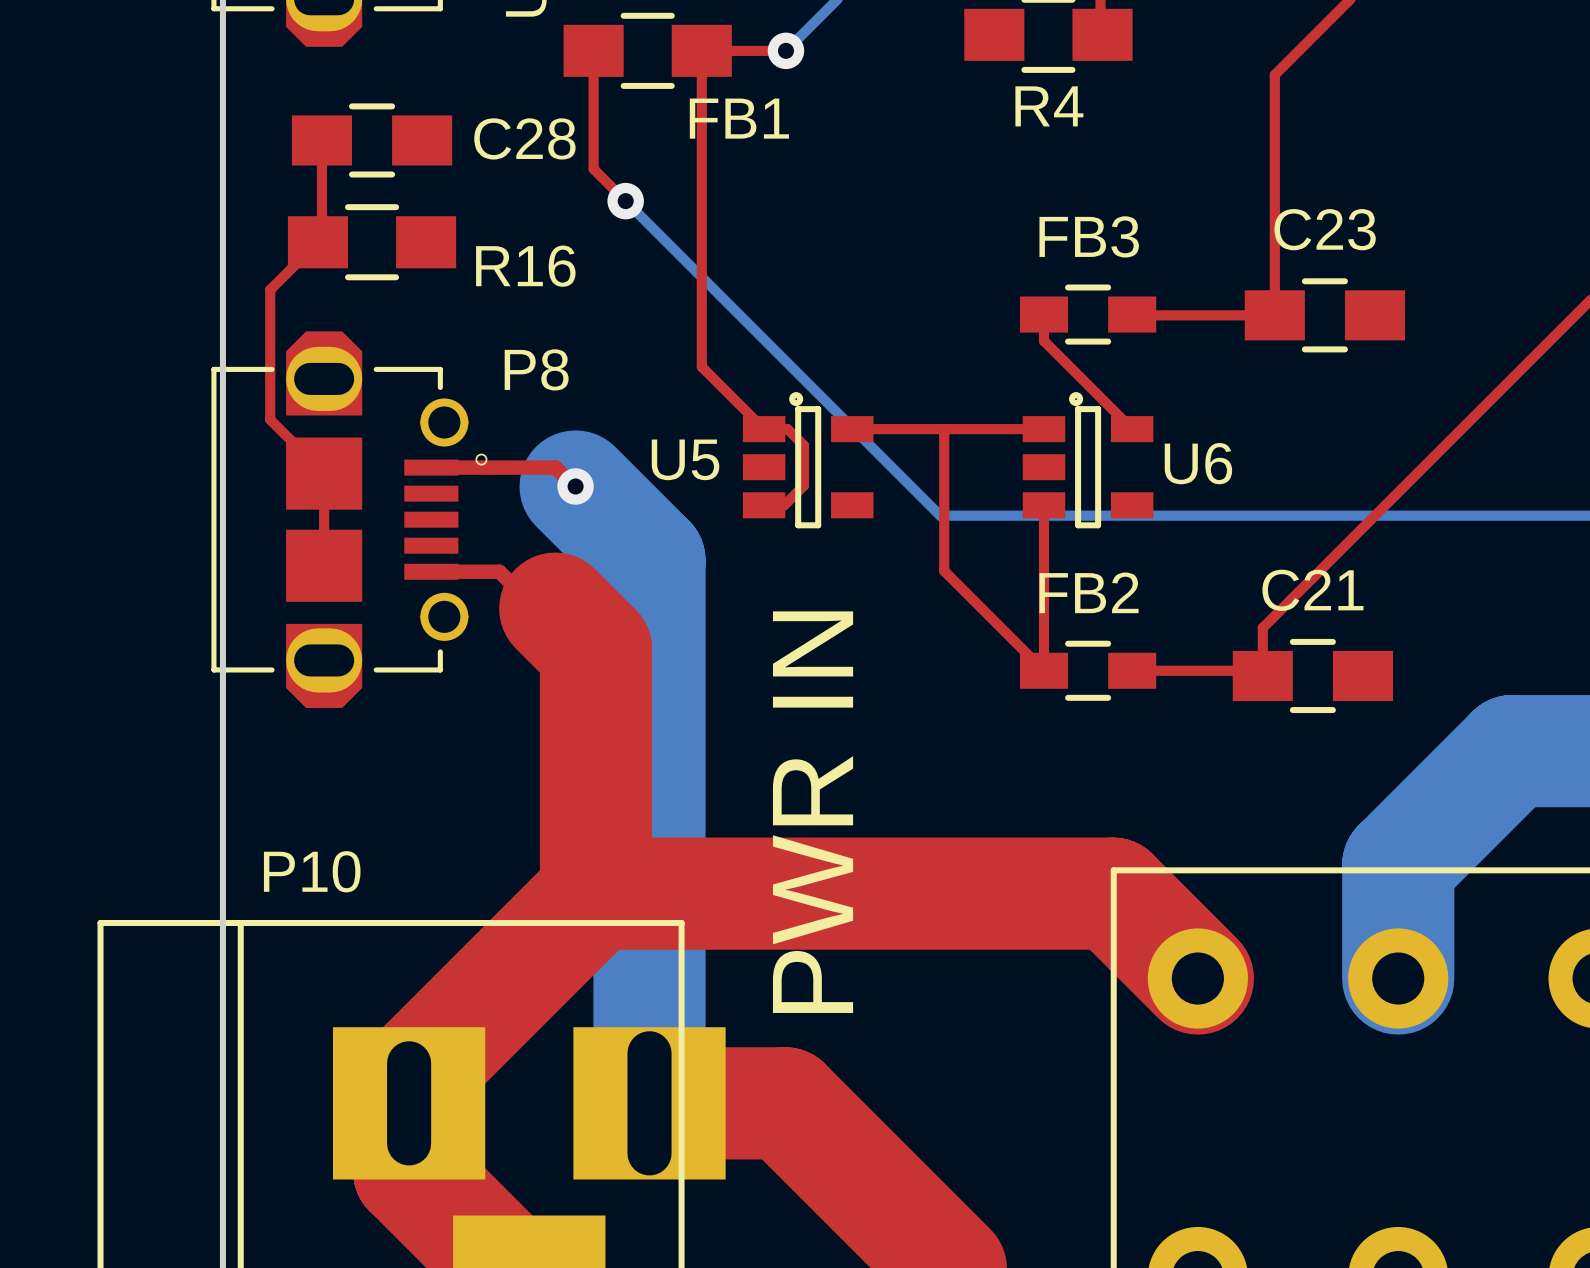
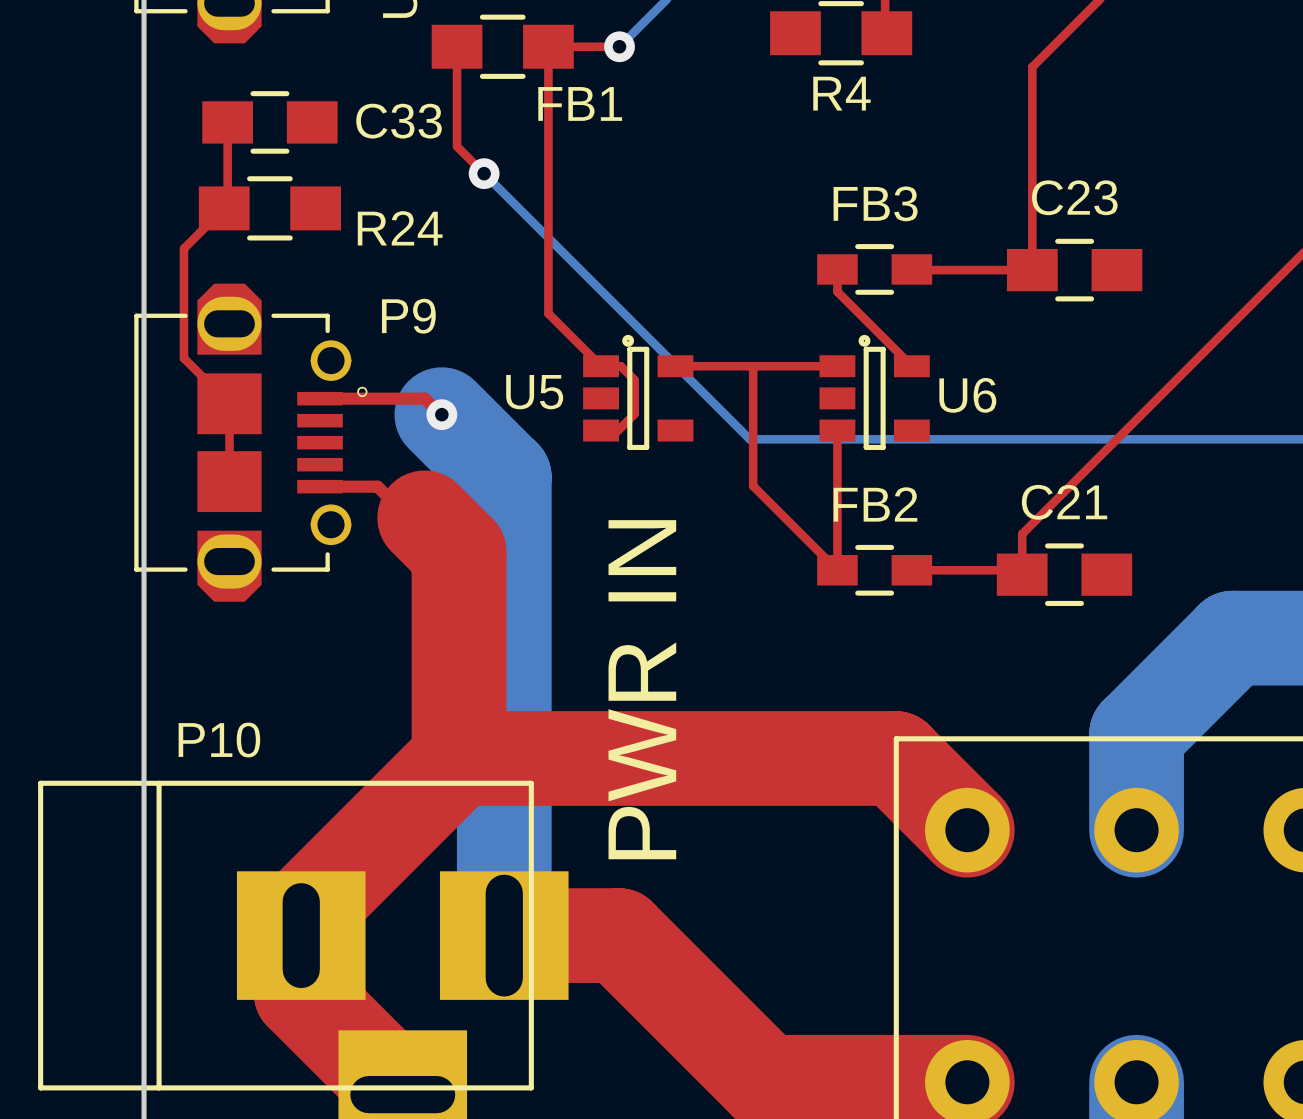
C28 name: C28 (524, 138) -> C33 (399, 121)
R16 name: R16 (525, 266) -> R24 (400, 228)
P8 name: P8 (536, 369) -> P9 (408, 316)

